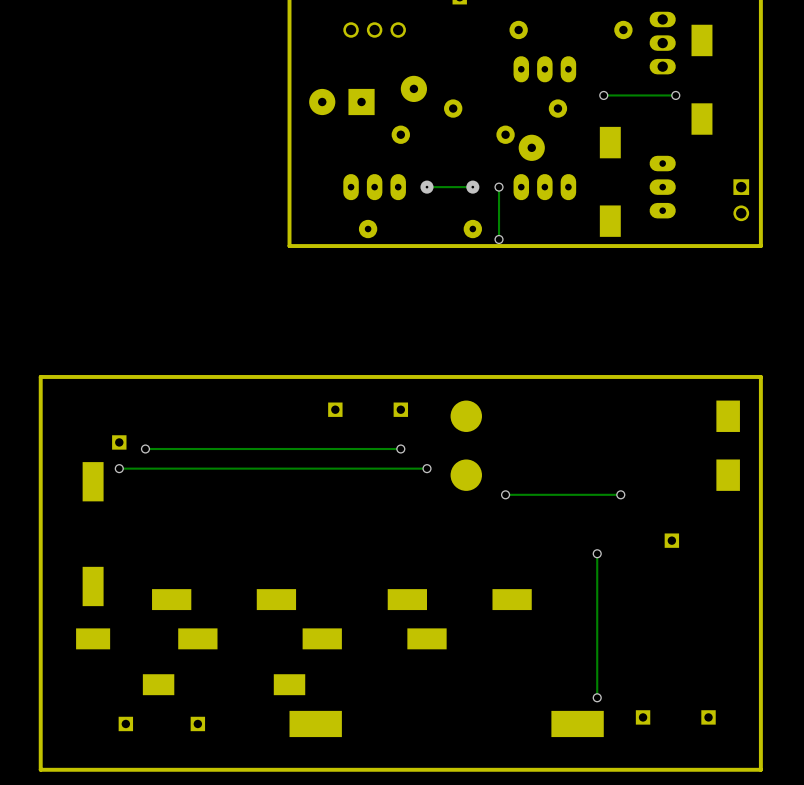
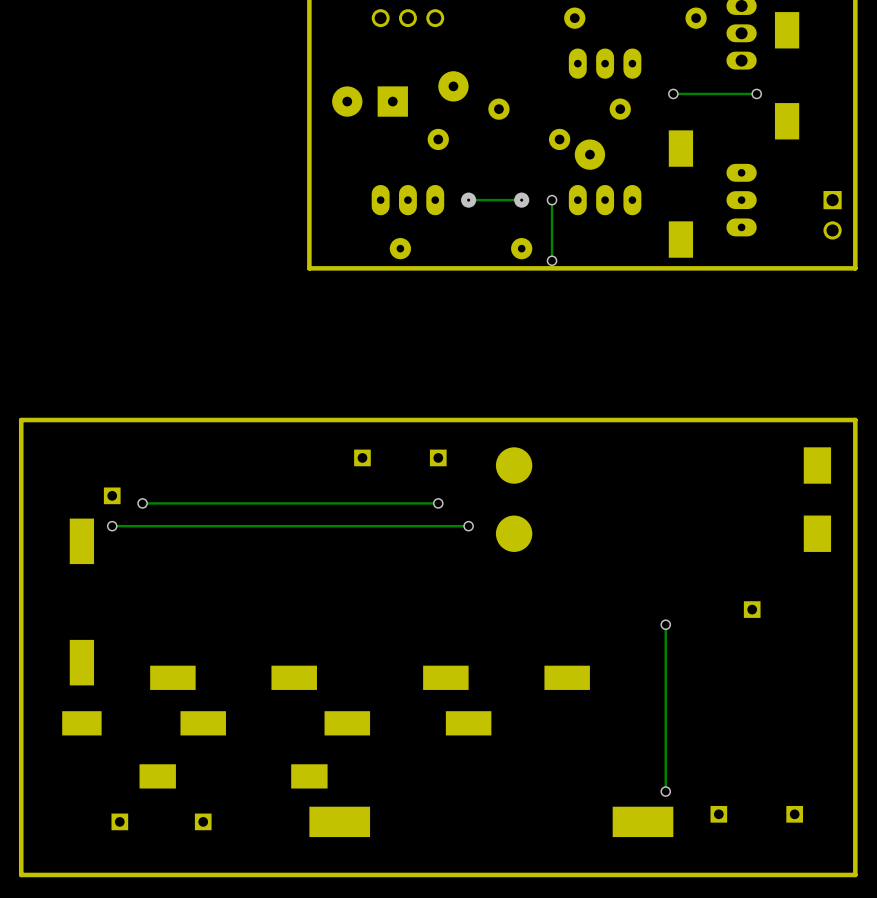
via: (505, 494) -> none
track: (620, 494) (505, 494) -> none
via: (620, 494) -> none

